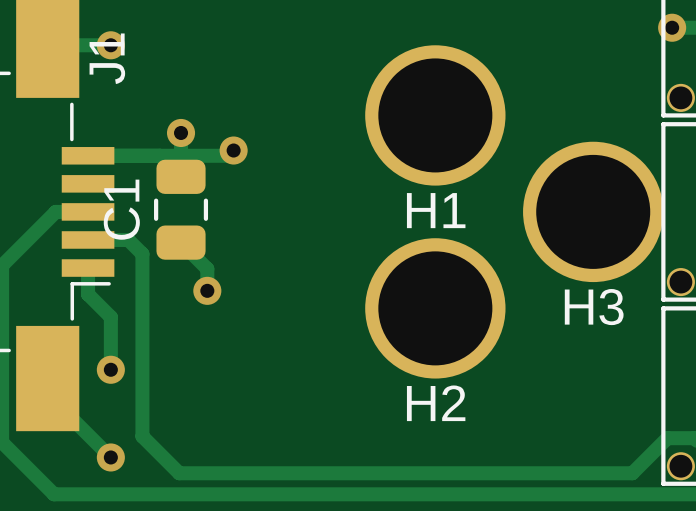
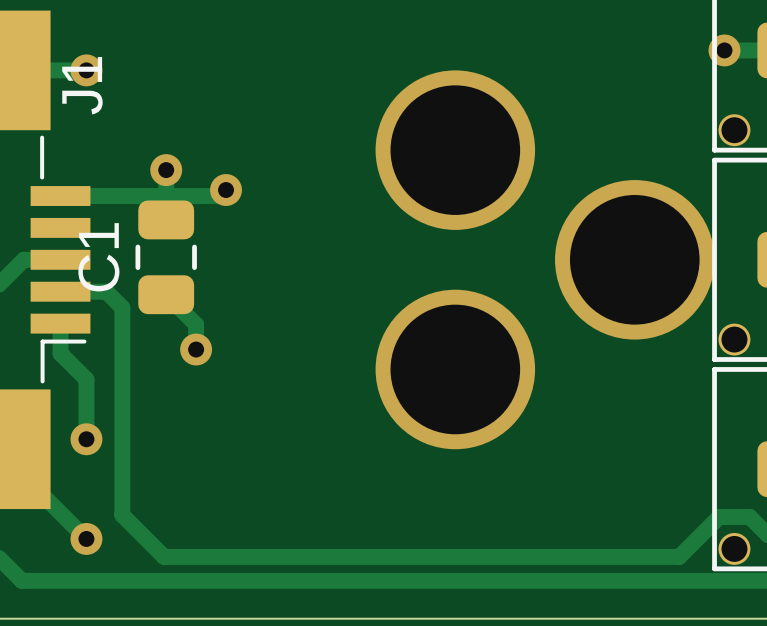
H1: (435, 115) -> none
H3: (593, 211) -> none
H2: (435, 308) -> none

